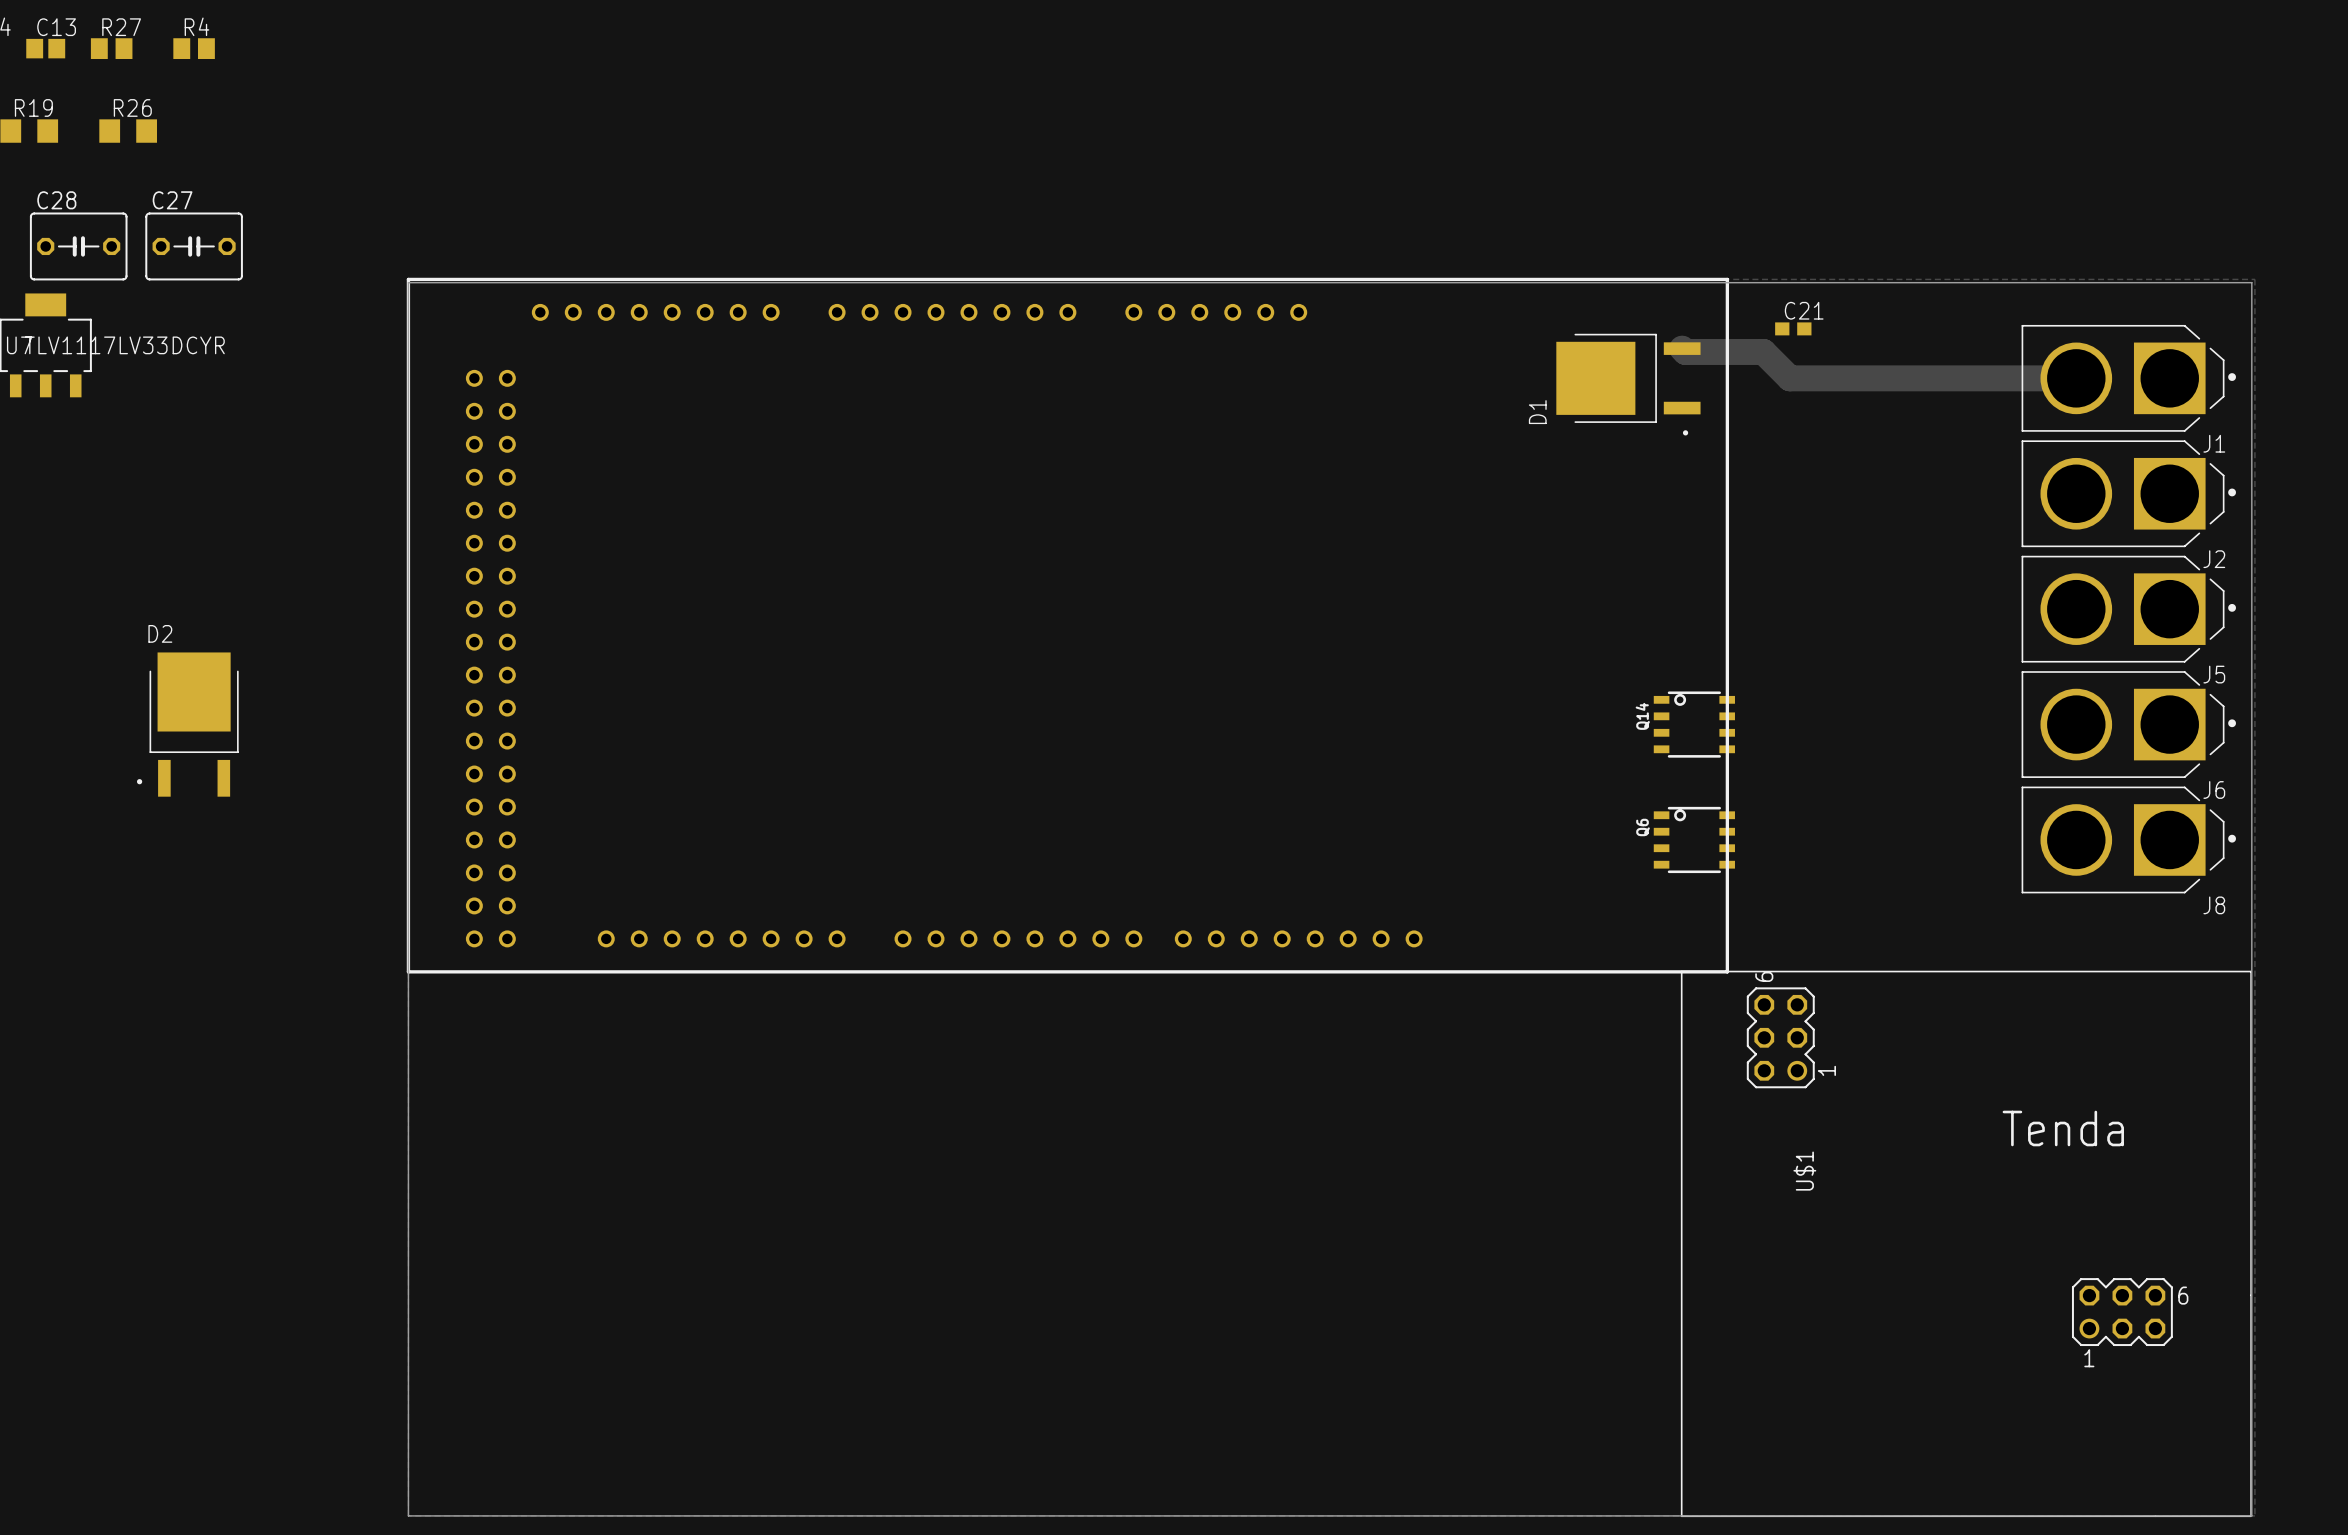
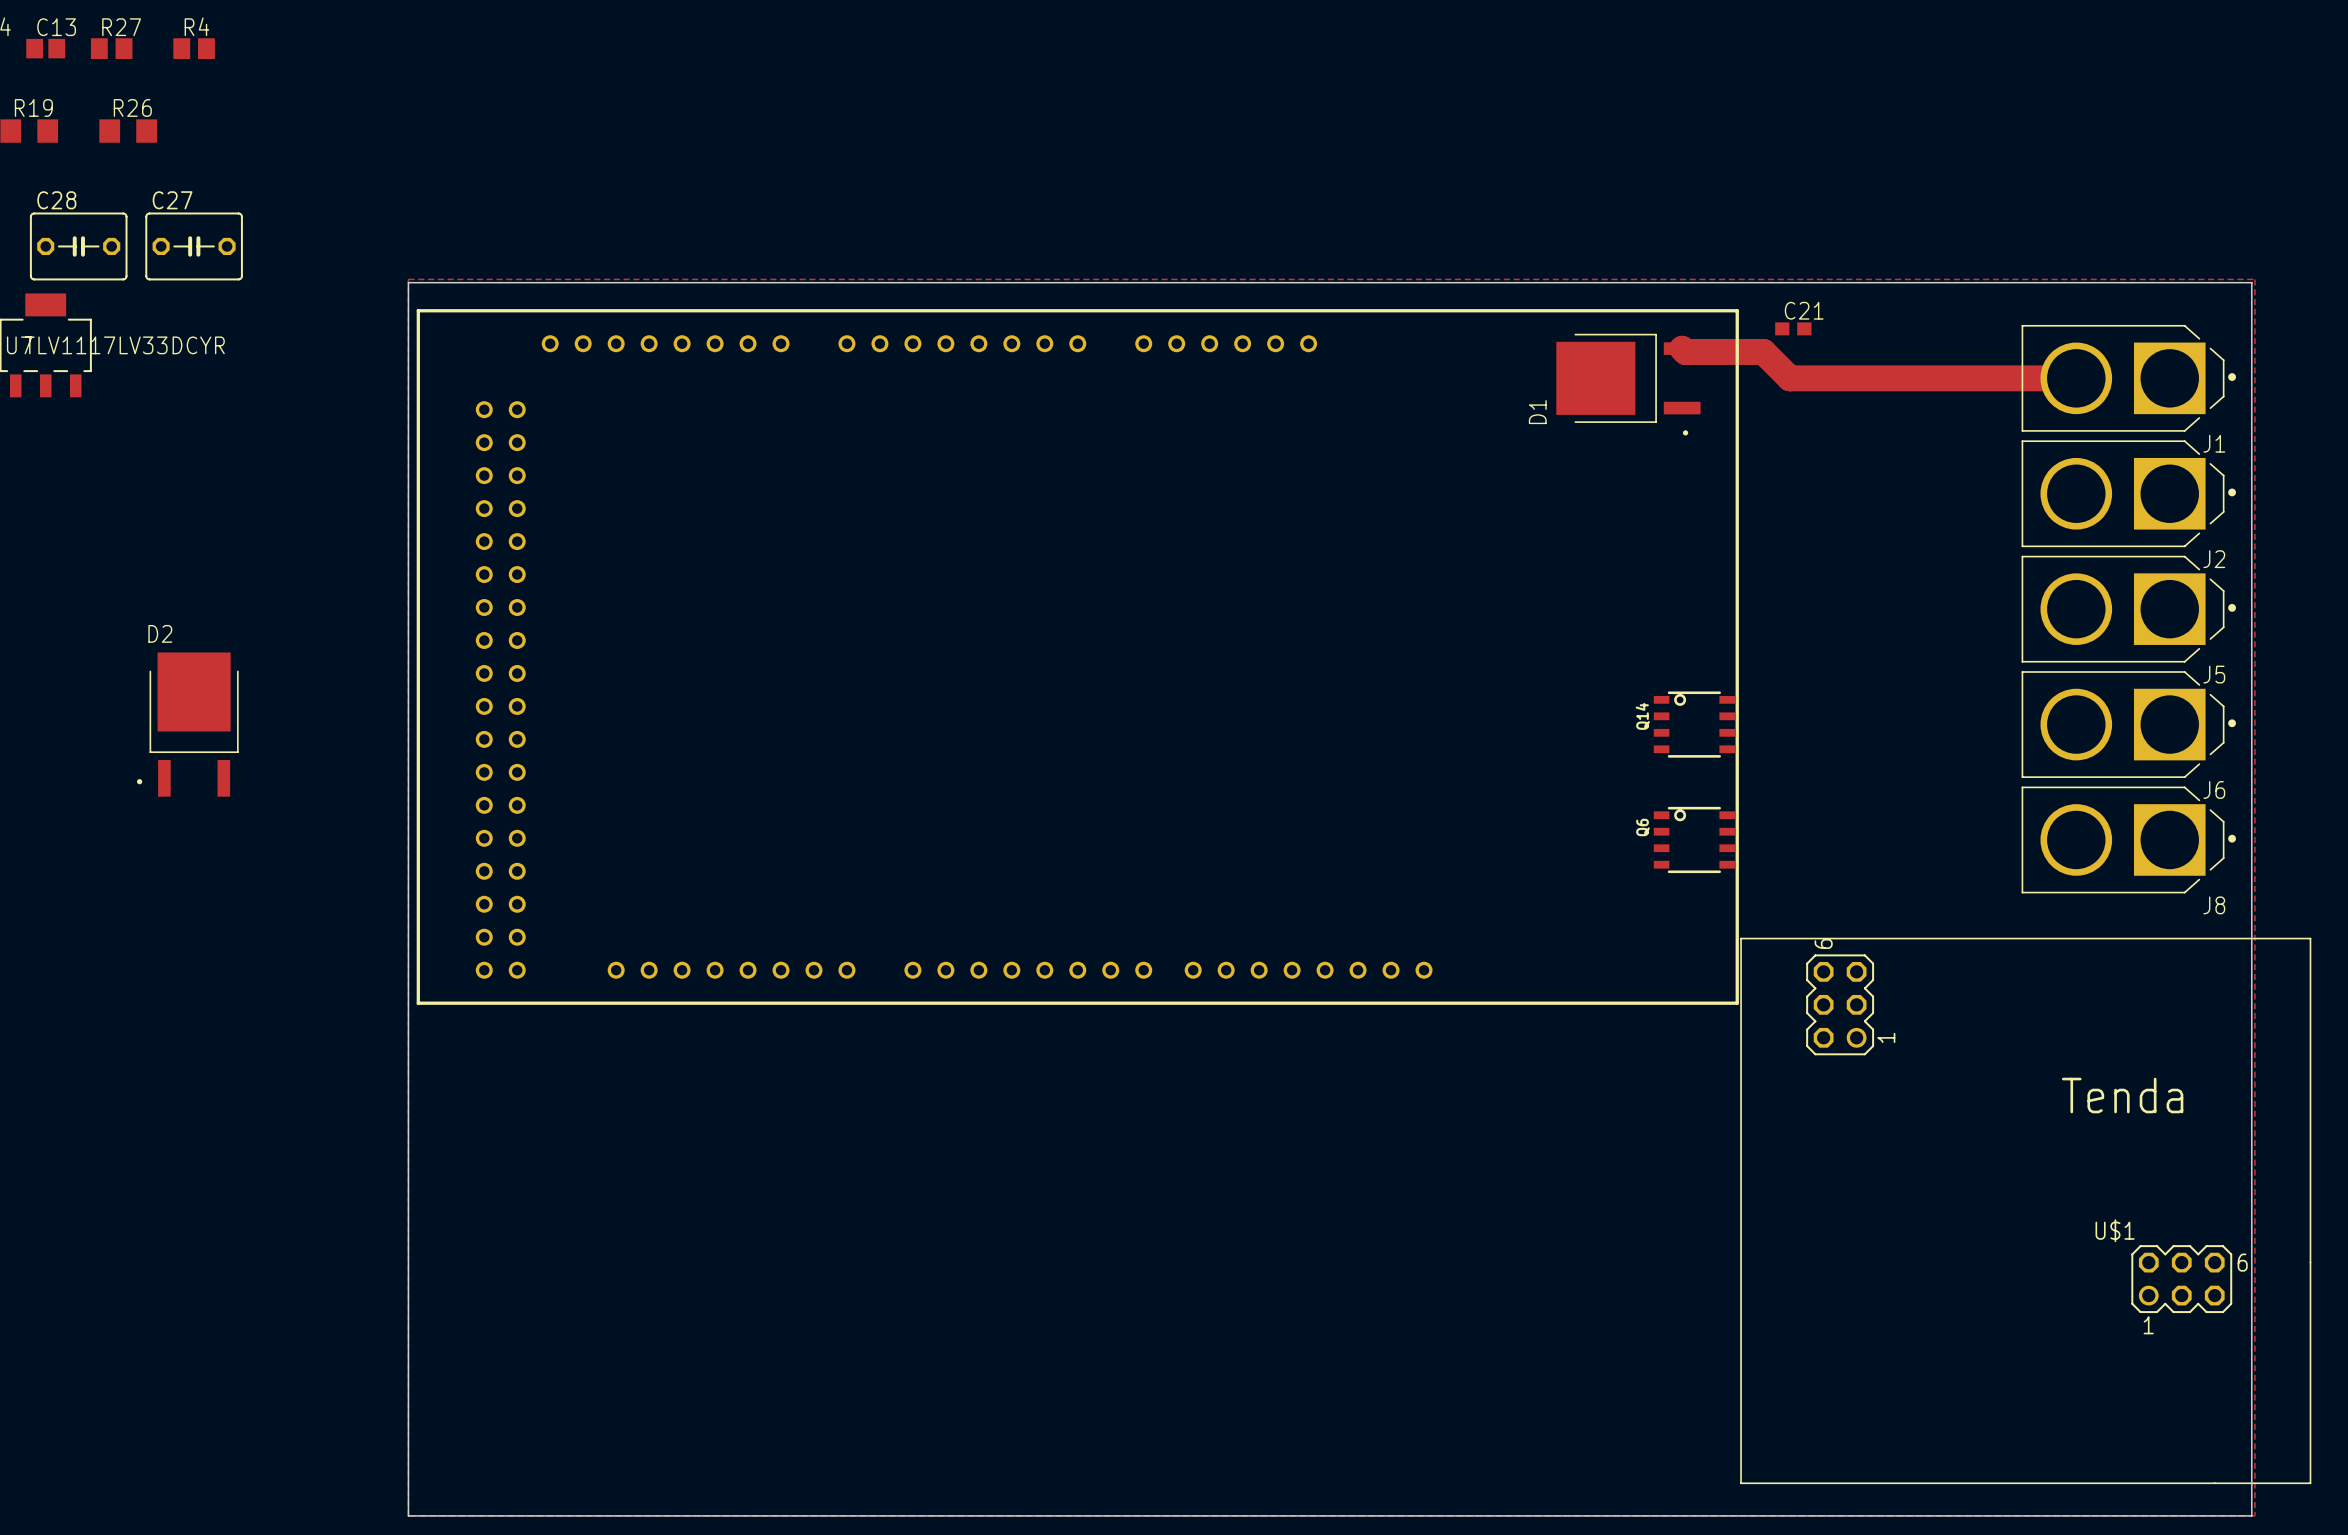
part position: (1067, 625) -> (1077, 656)
U$1 name rotation: 0° (1804, 1171) -> 90° clockwise (2115, 1230)
U$1 name position: U$1 (1804, 1171) -> U$1 (2115, 1230)
U$1 position: (1966, 1243) -> (2025, 1210)

